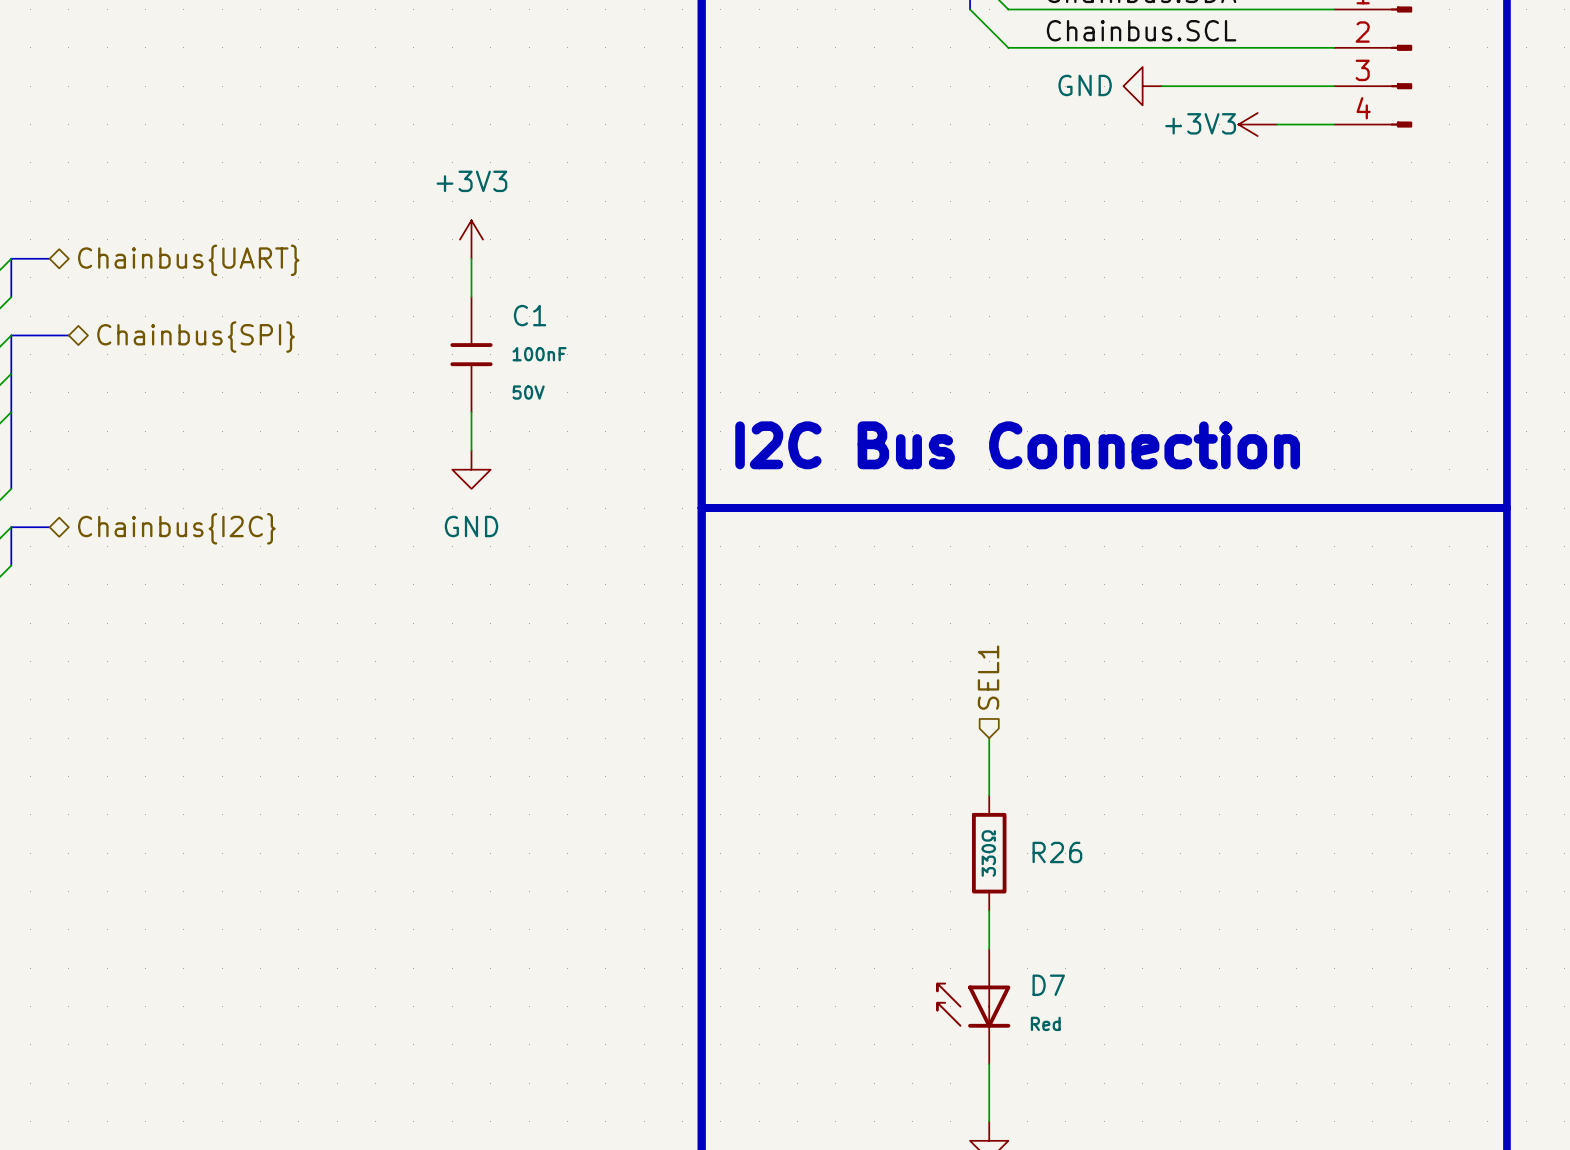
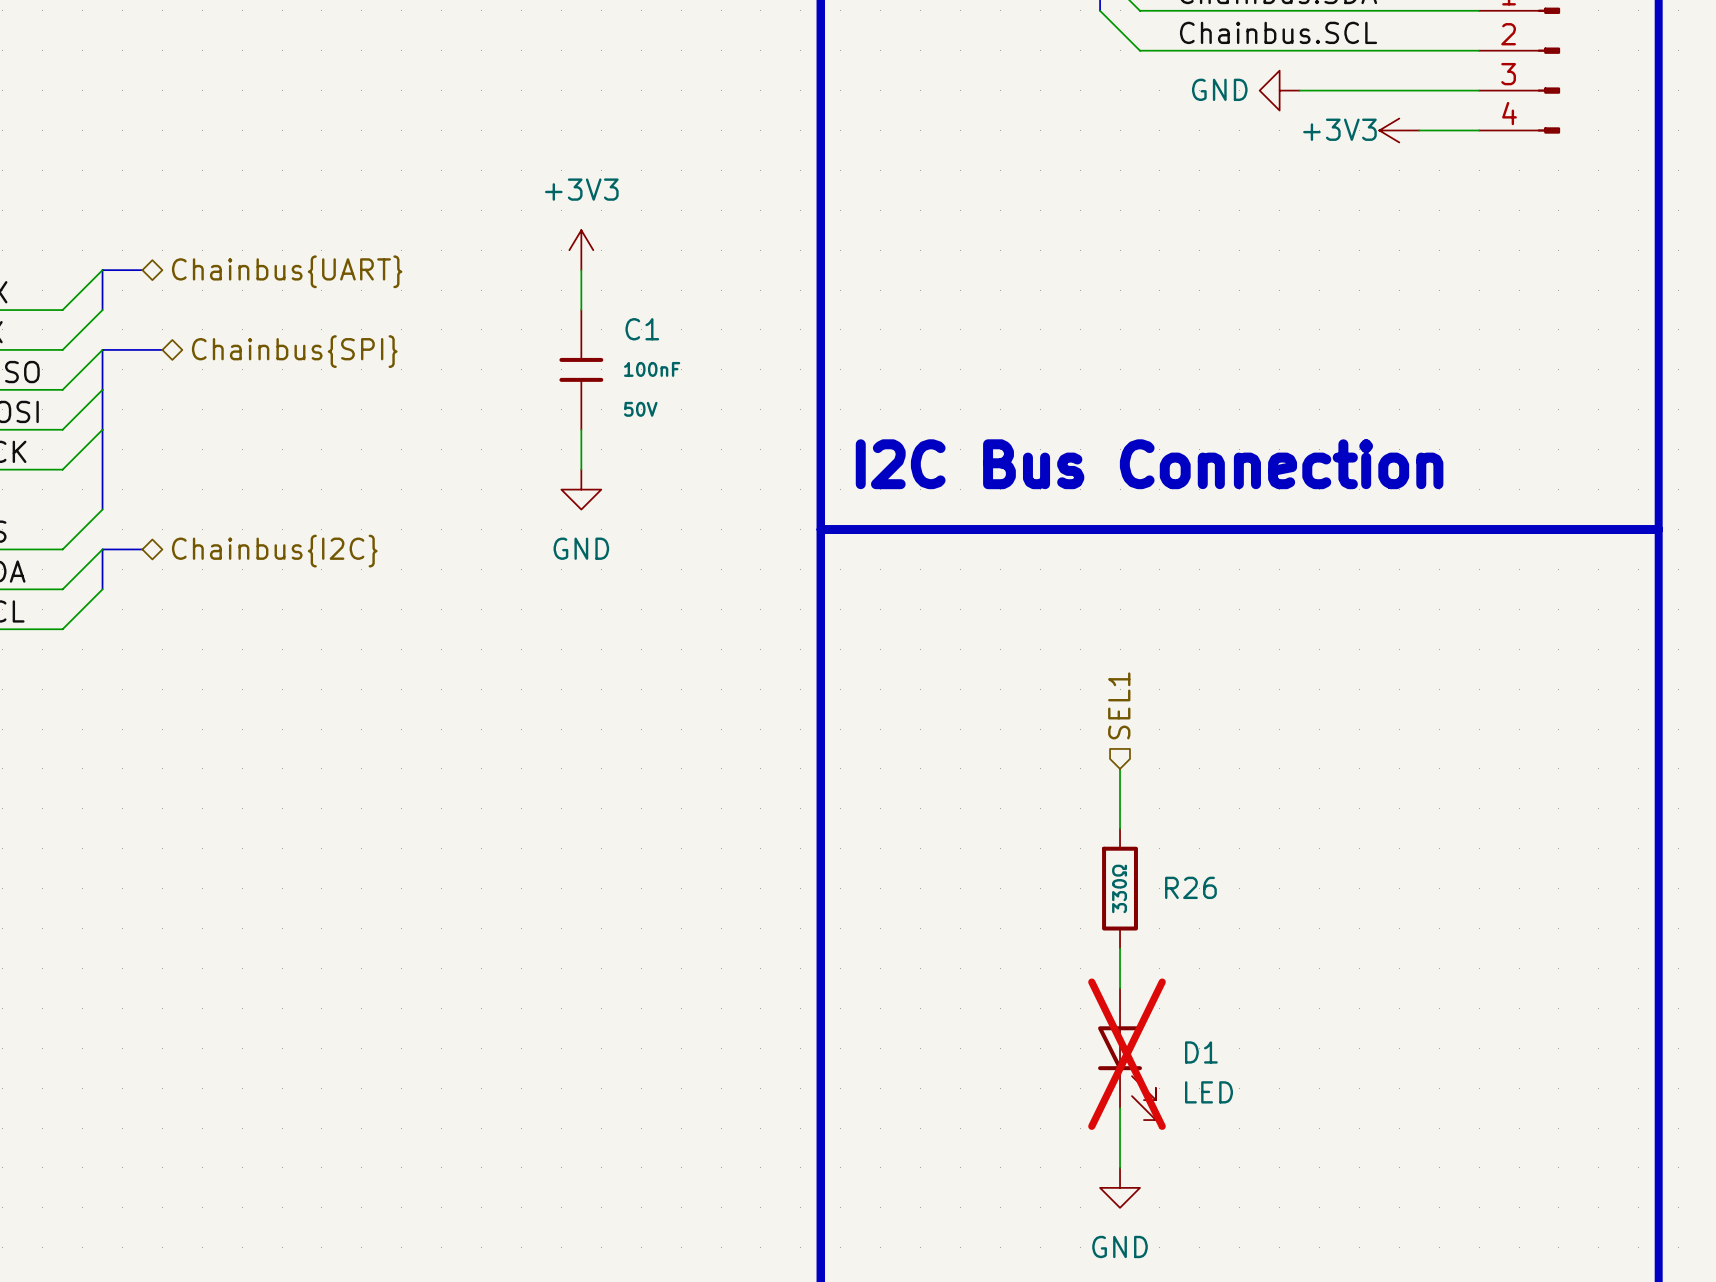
D7: Red (973, 1006) -> none
D1: none -> LED (1127, 1054)

